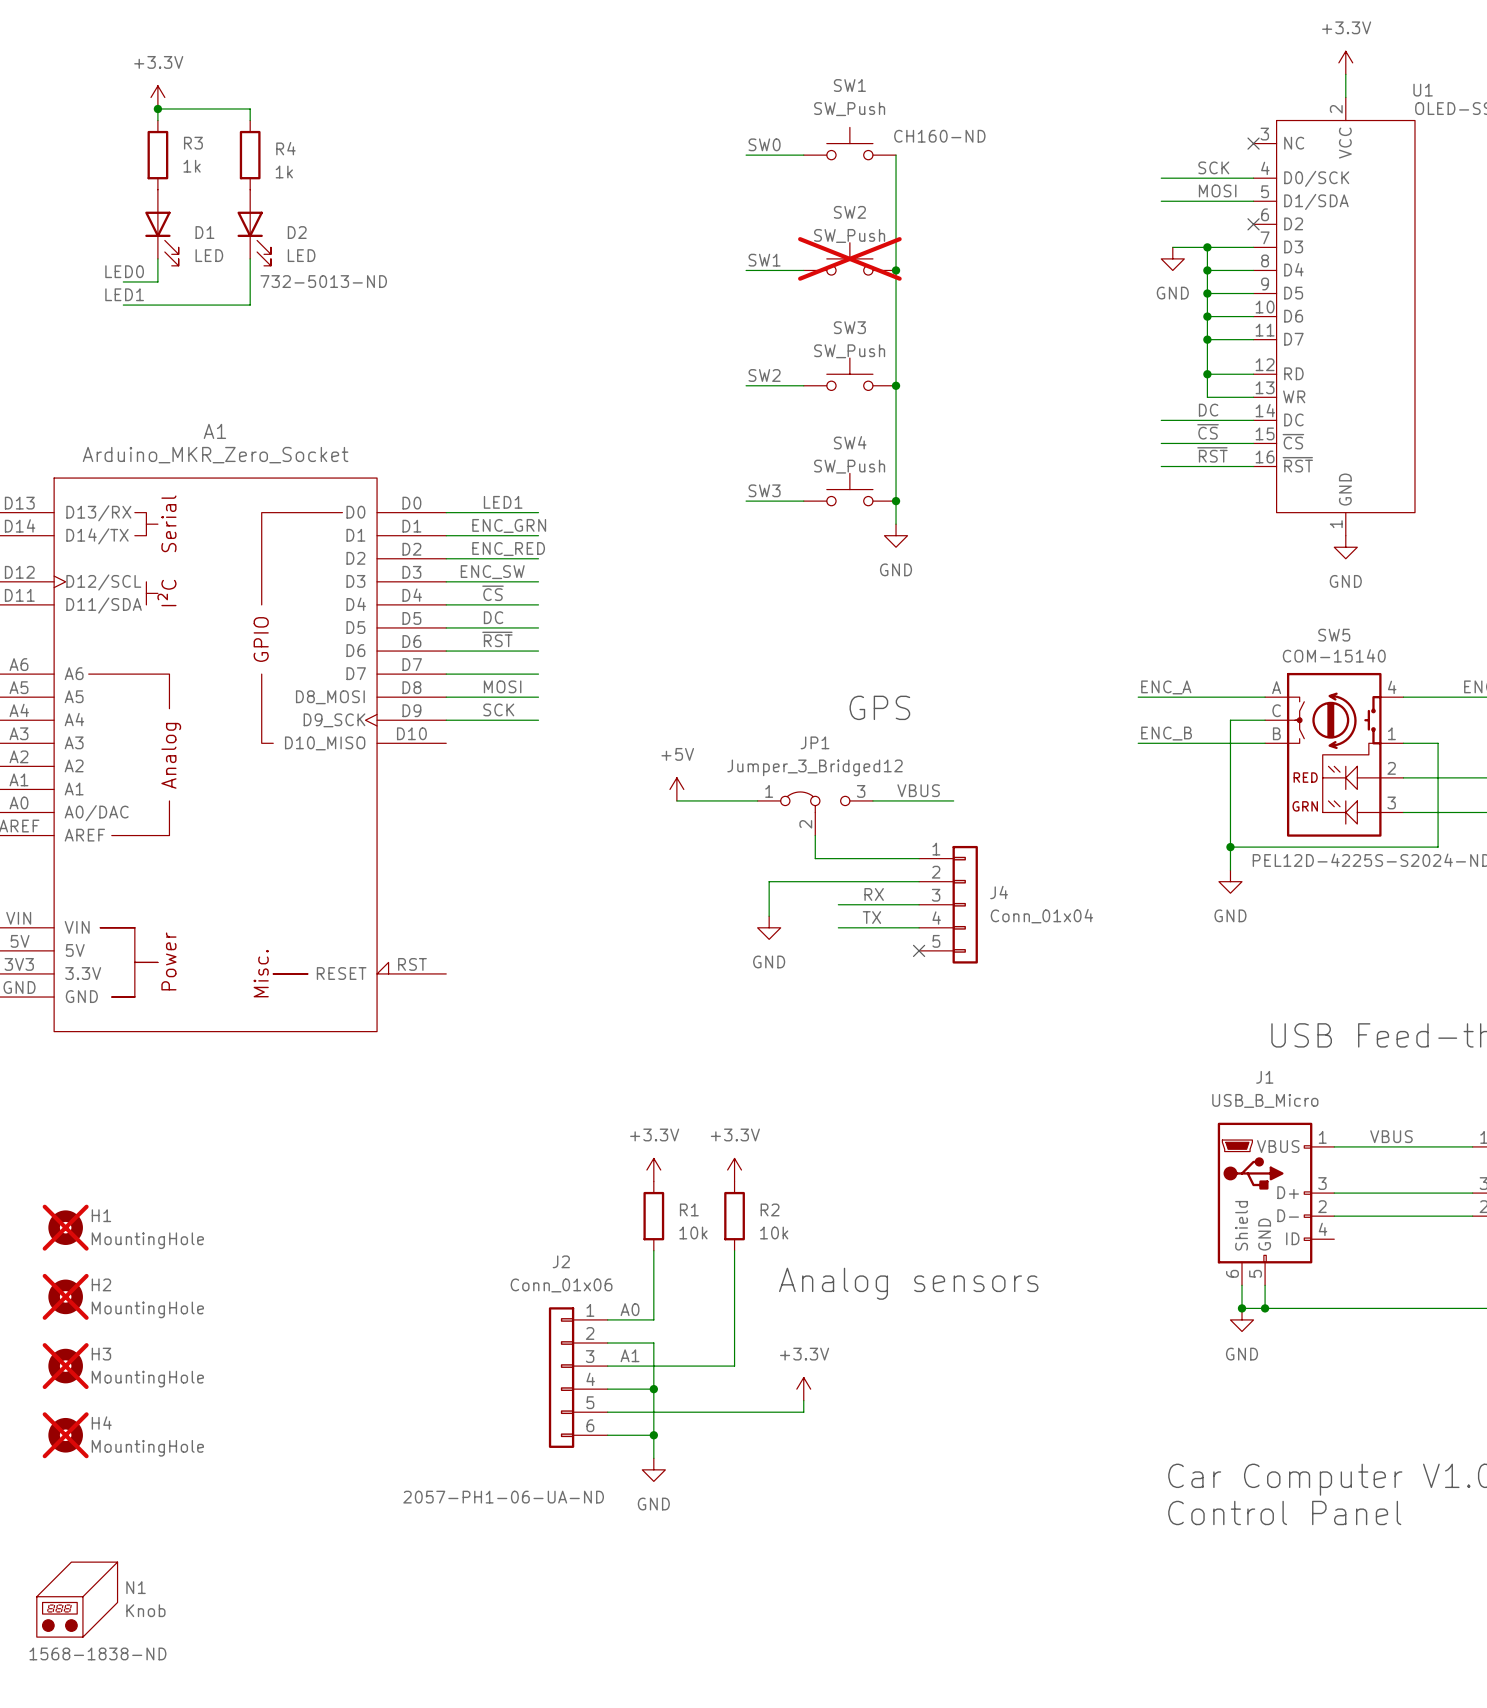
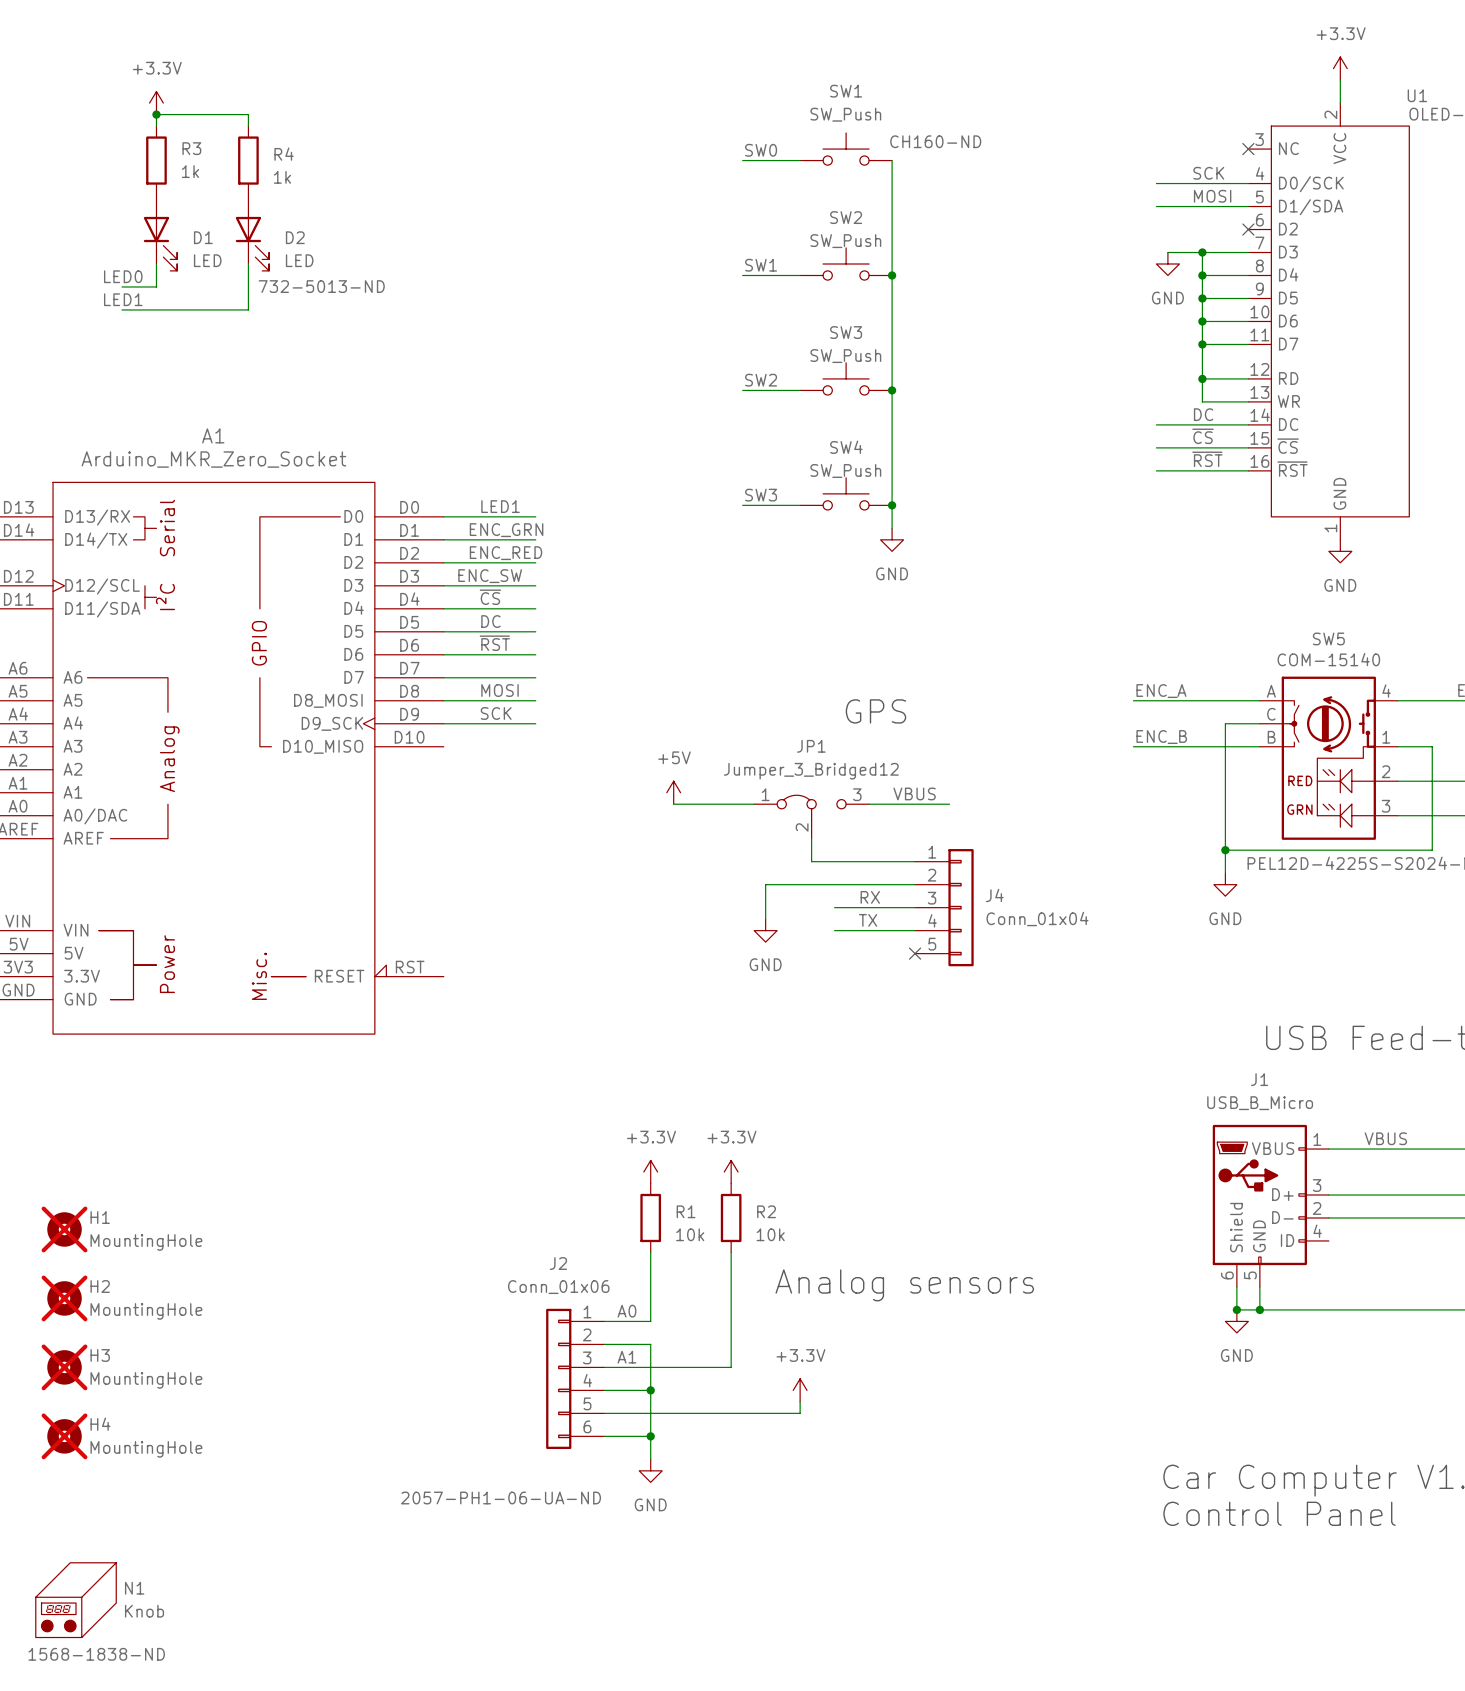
SW2 do-not-place cross: (849, 258) -> none

